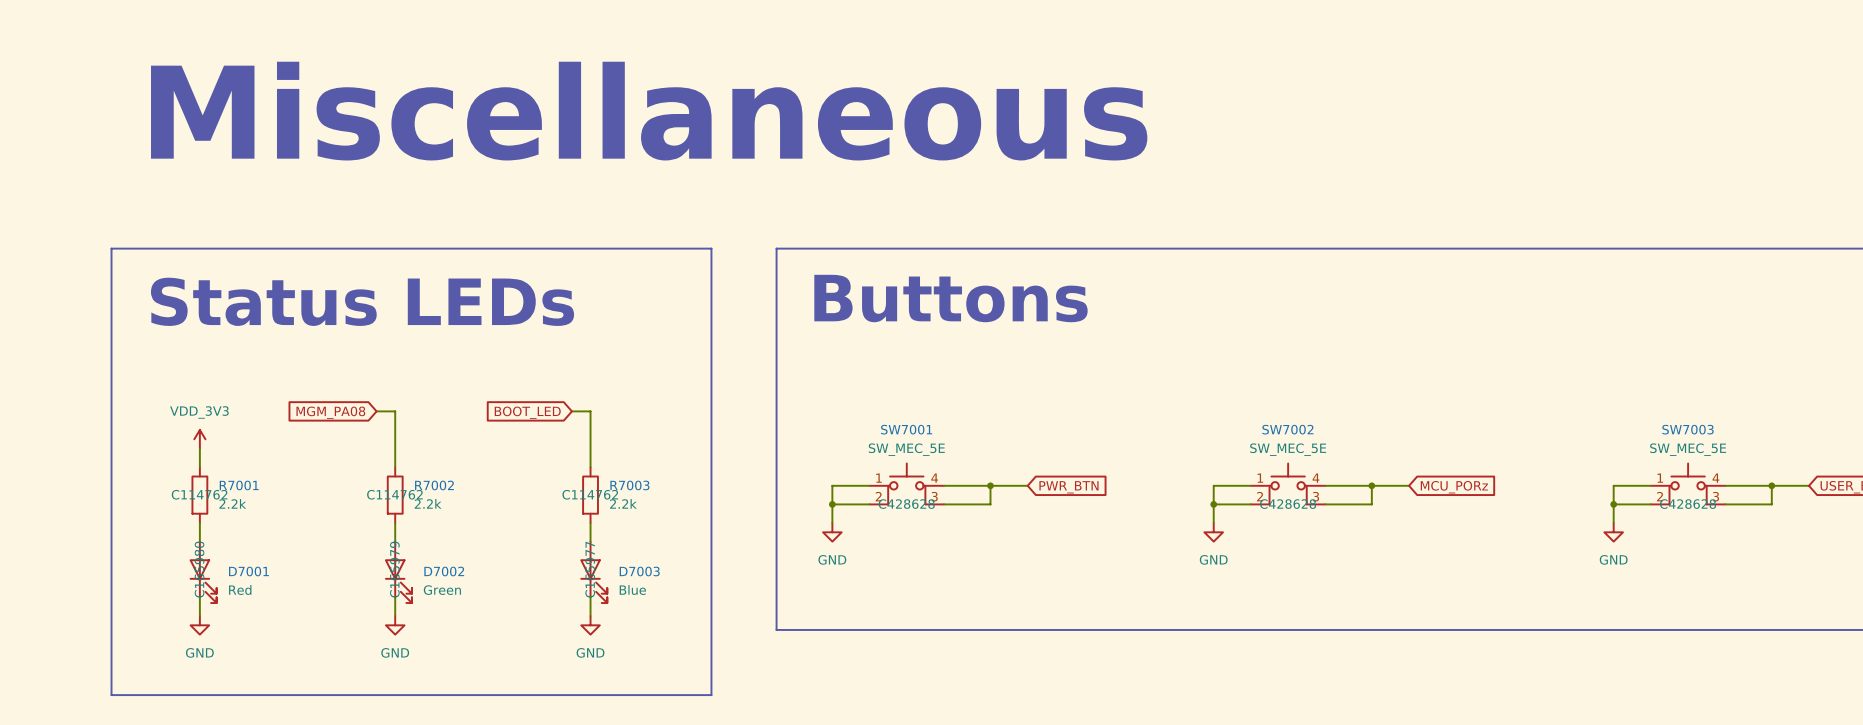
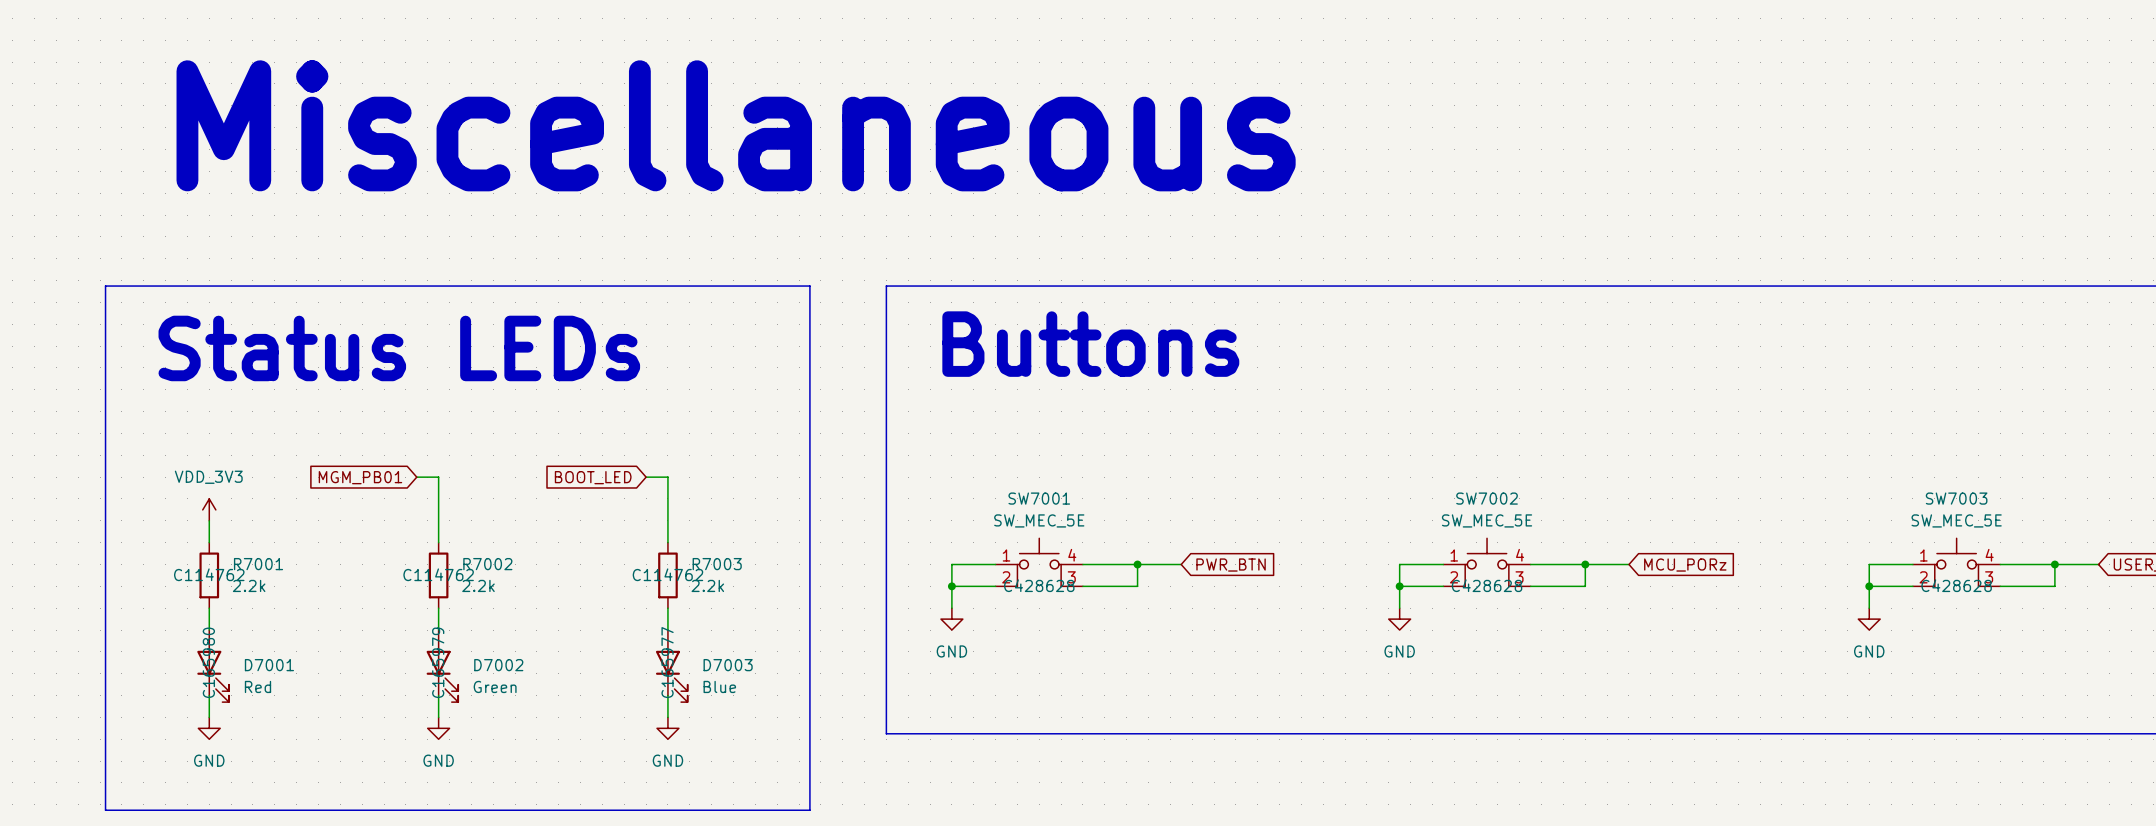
global label: MGM_PA08 (330, 412) -> MGM_PB01 (360, 477)

